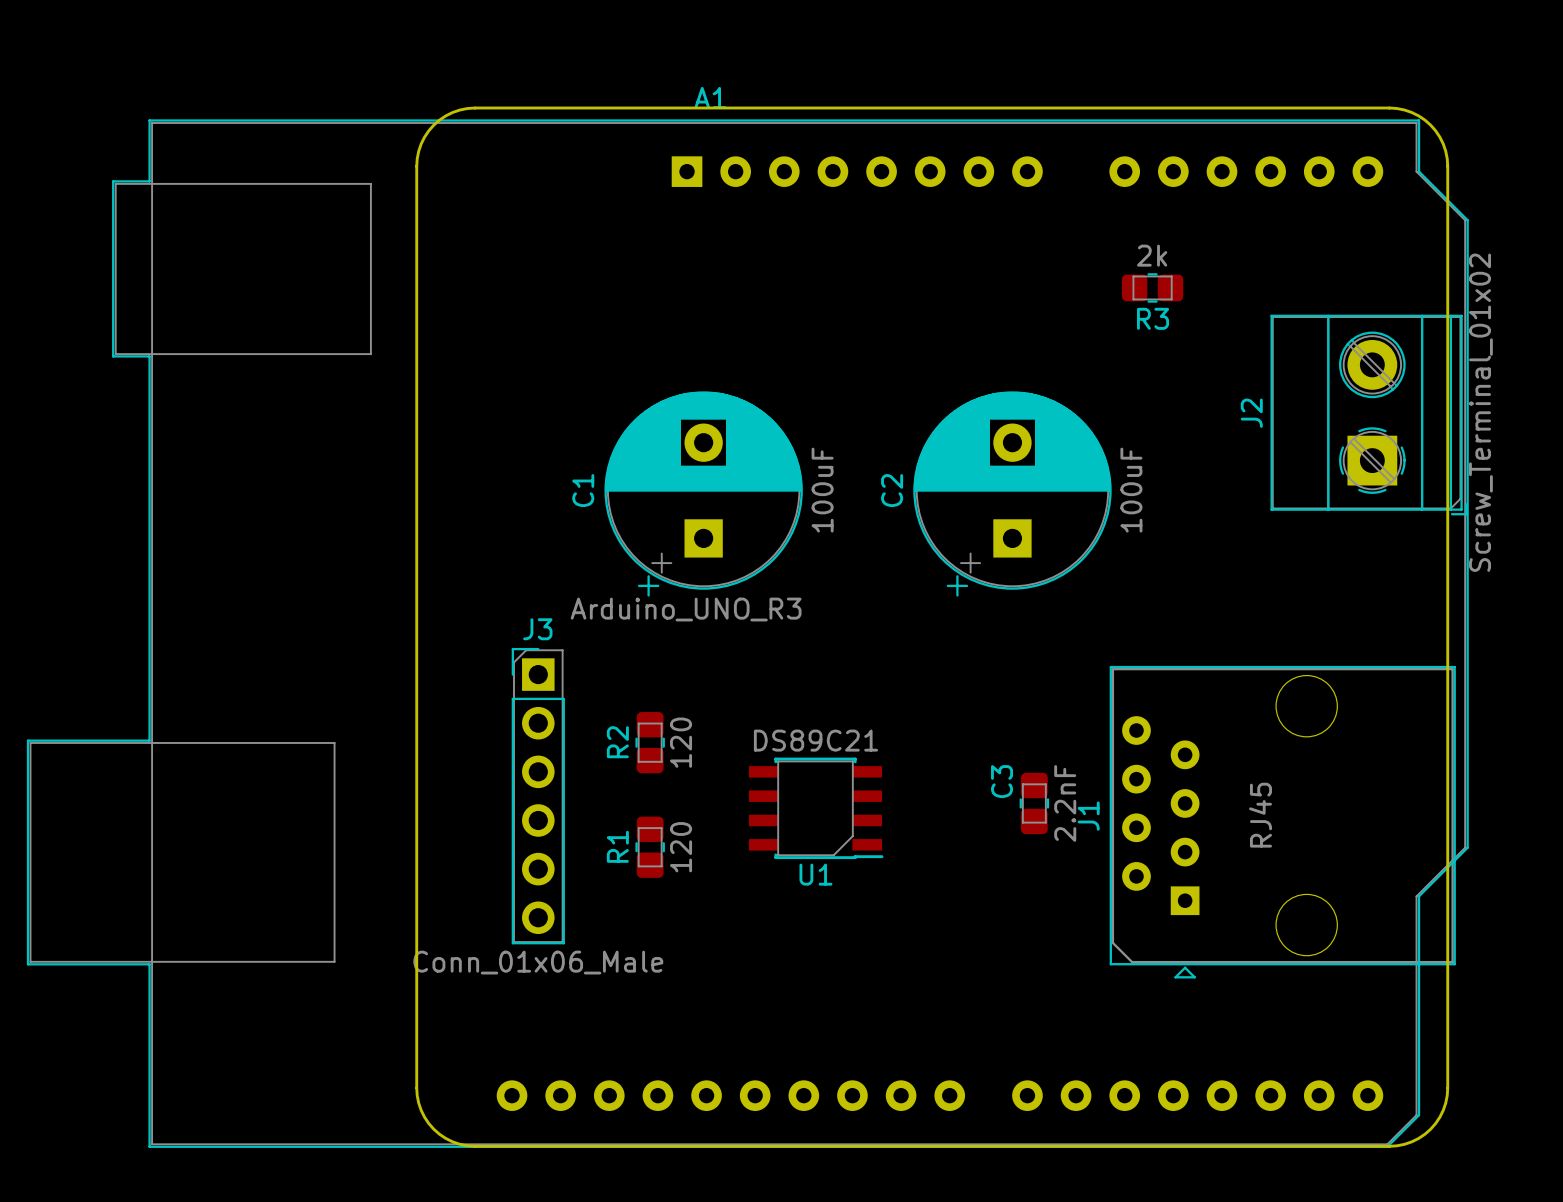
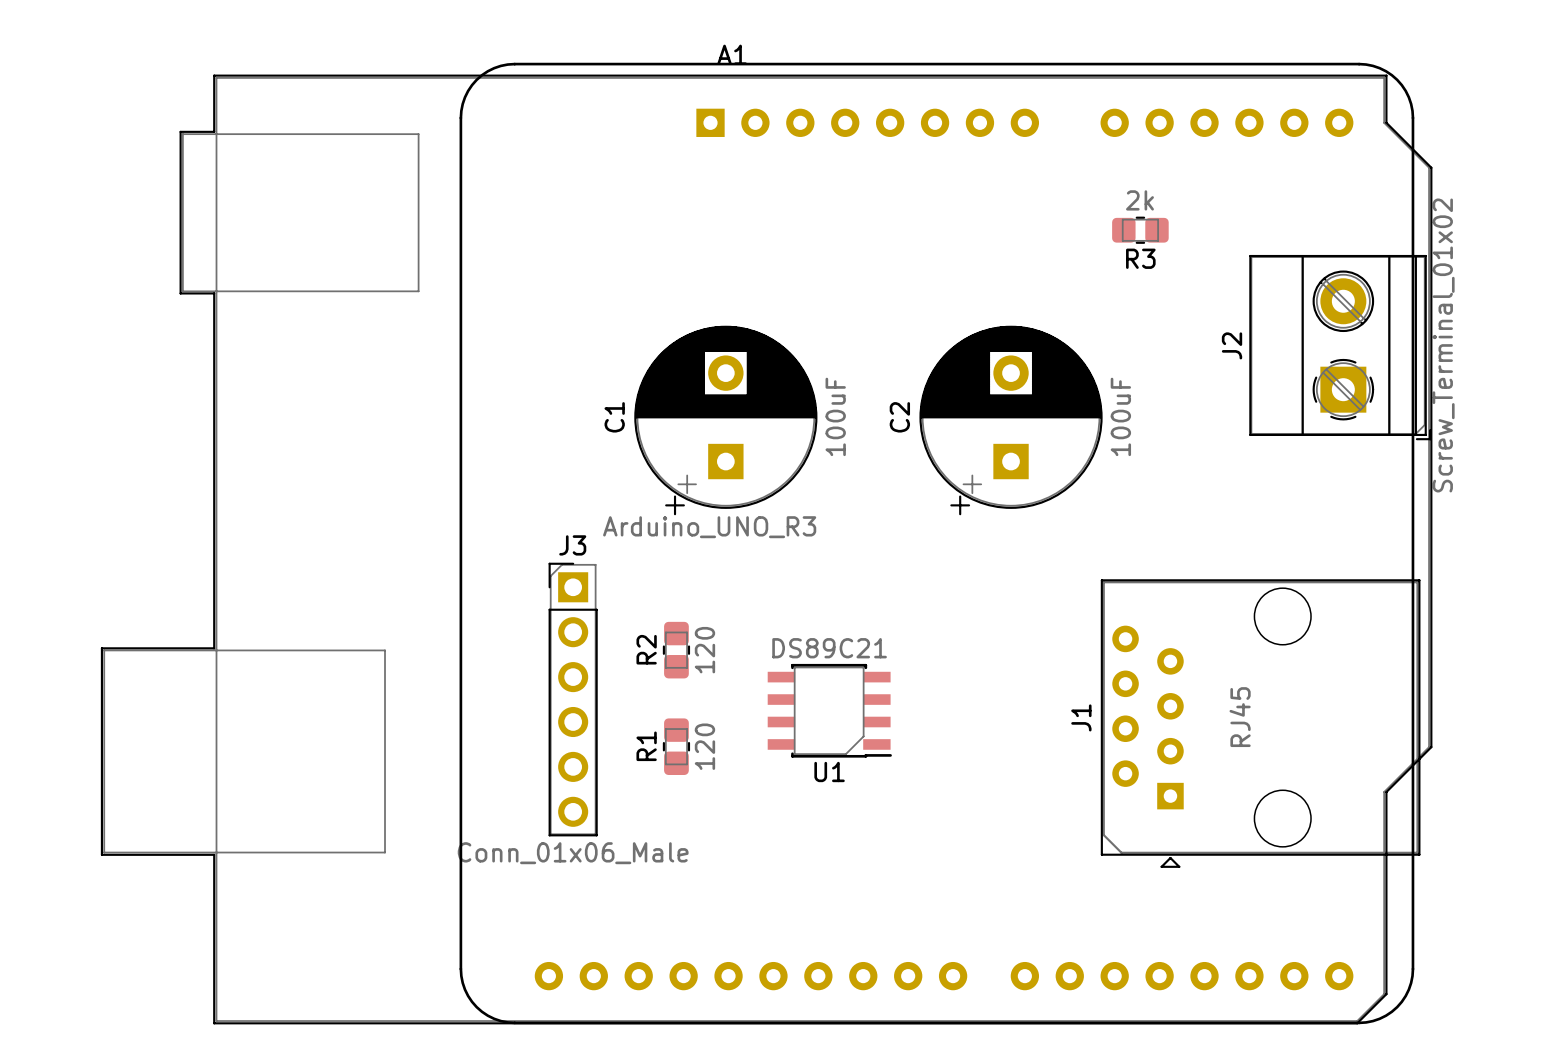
C3: 2.2nF (1034, 803) -> none

